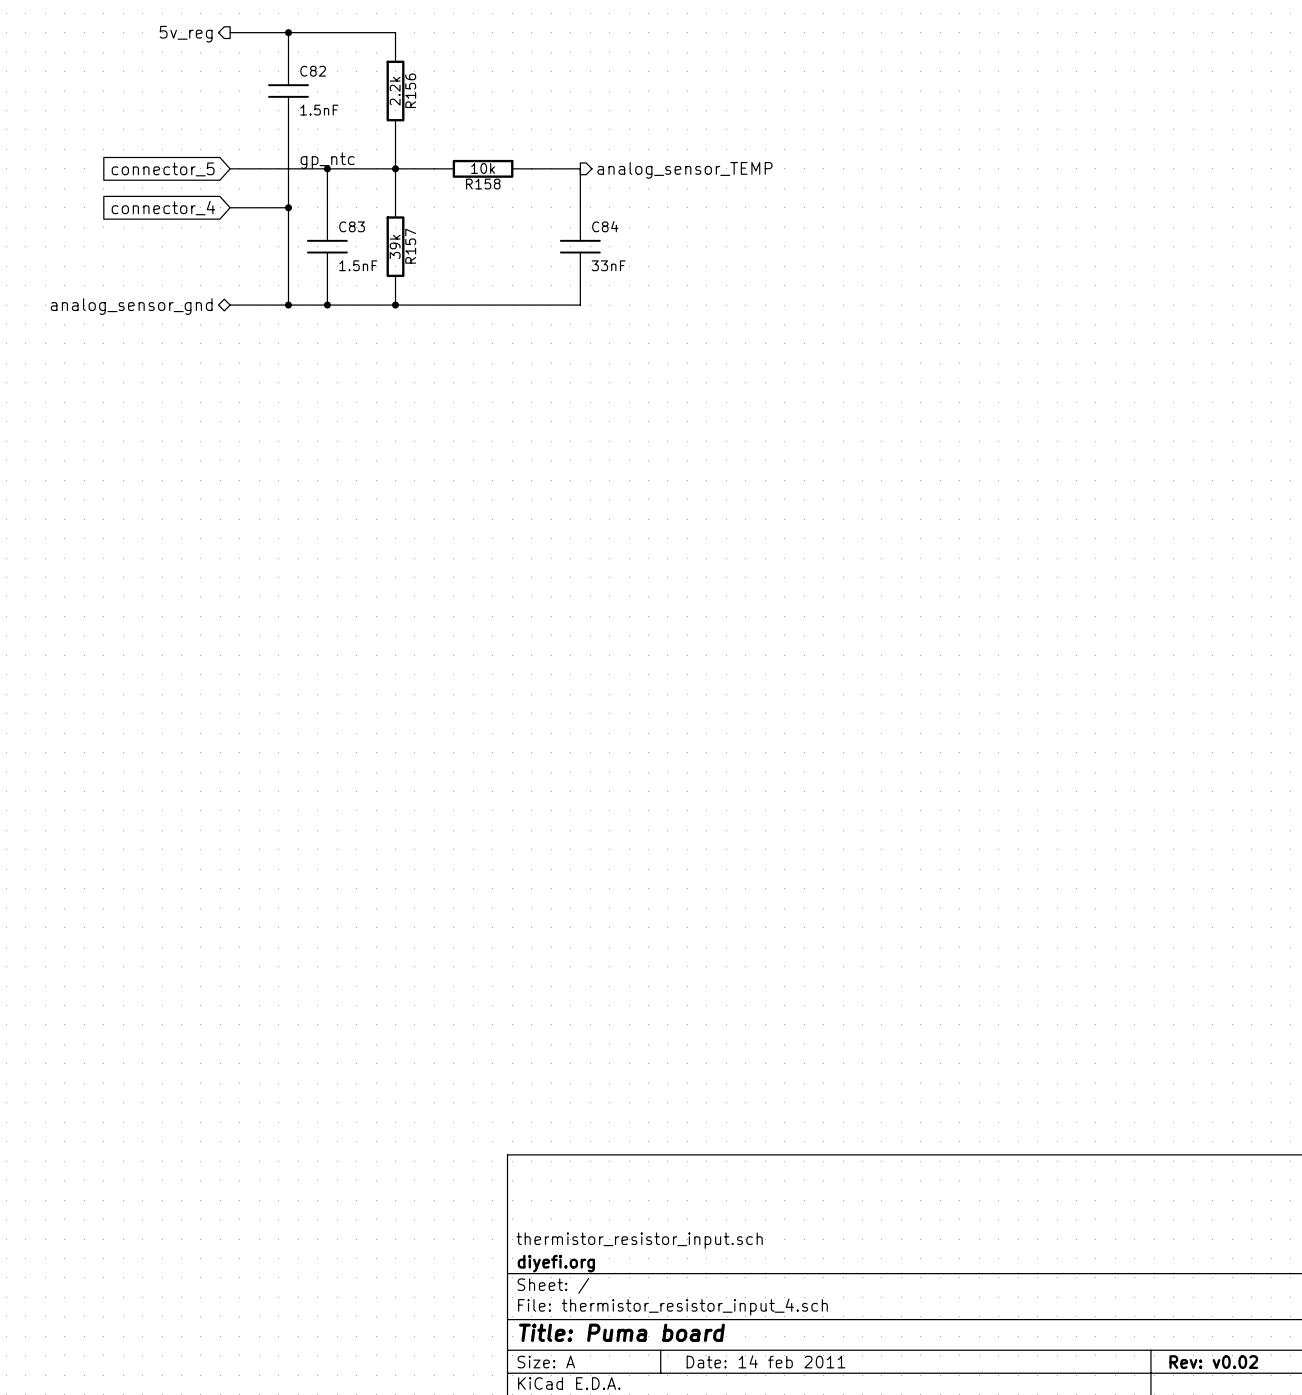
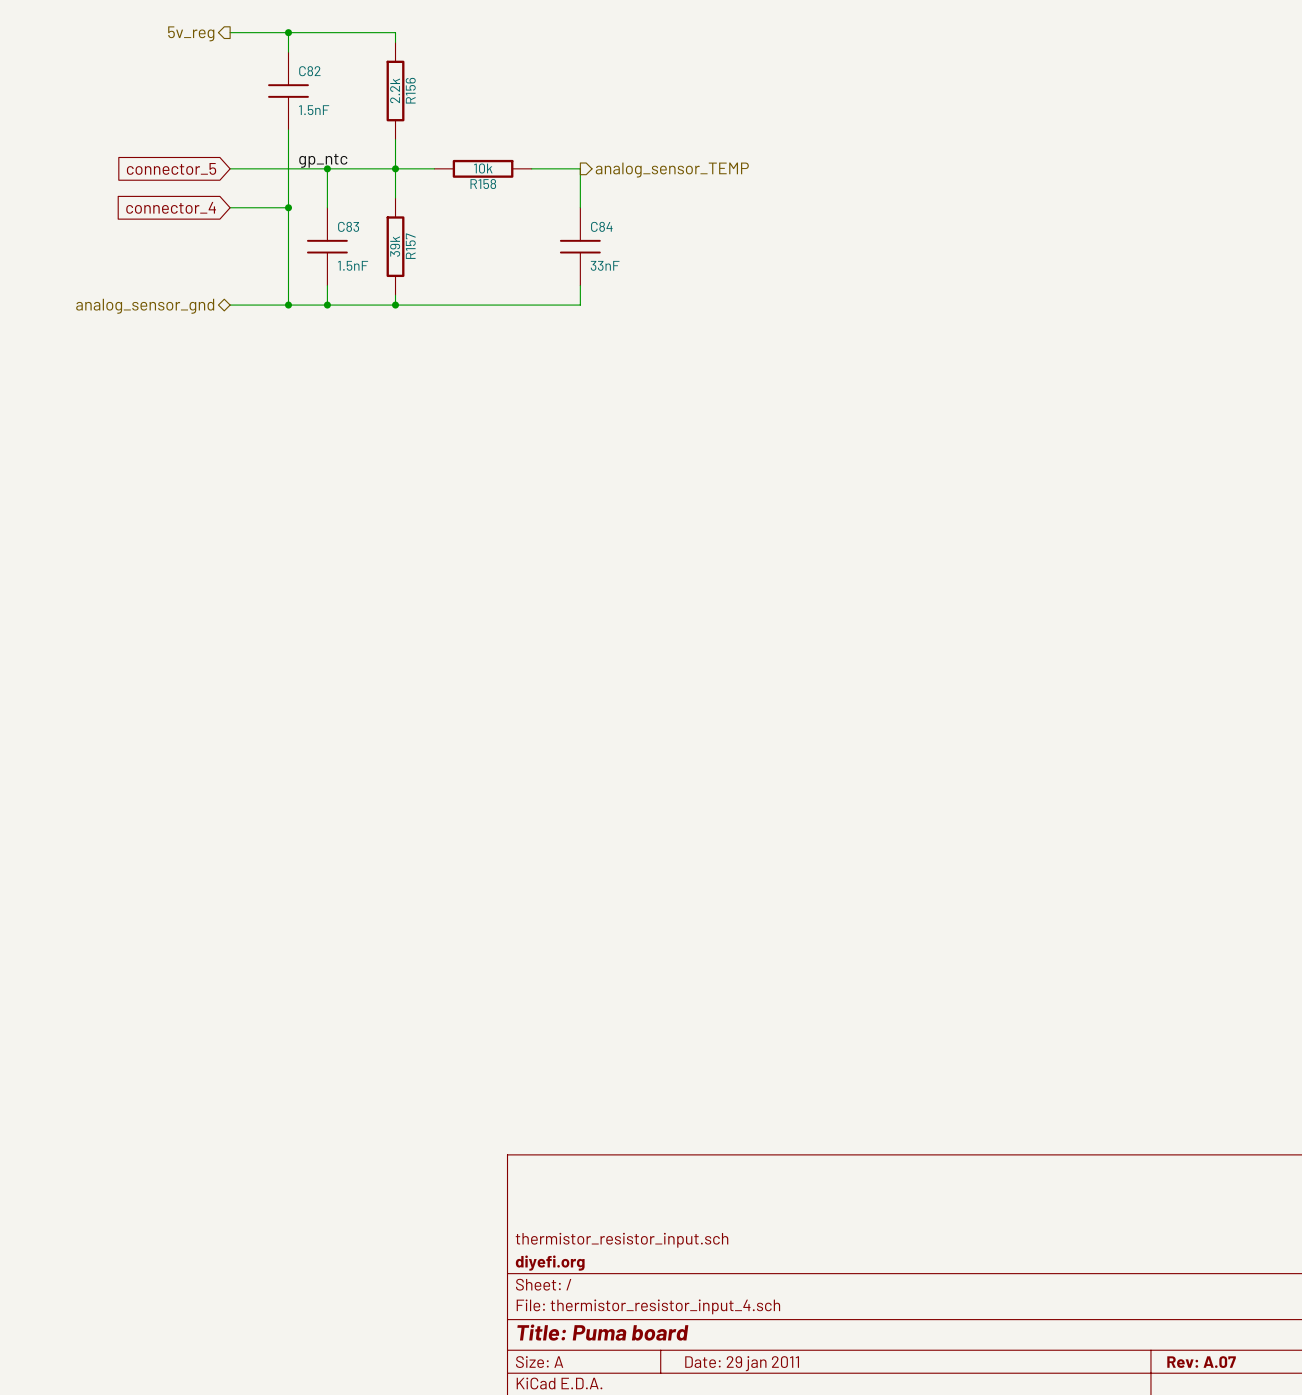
title block: Date: 14 feb 2011 (765, 1361) -> Date: 29 jan 2011 (742, 1363)
title block: Rev: v0.02 (1213, 1362) -> Rev: A.07 (1201, 1362)

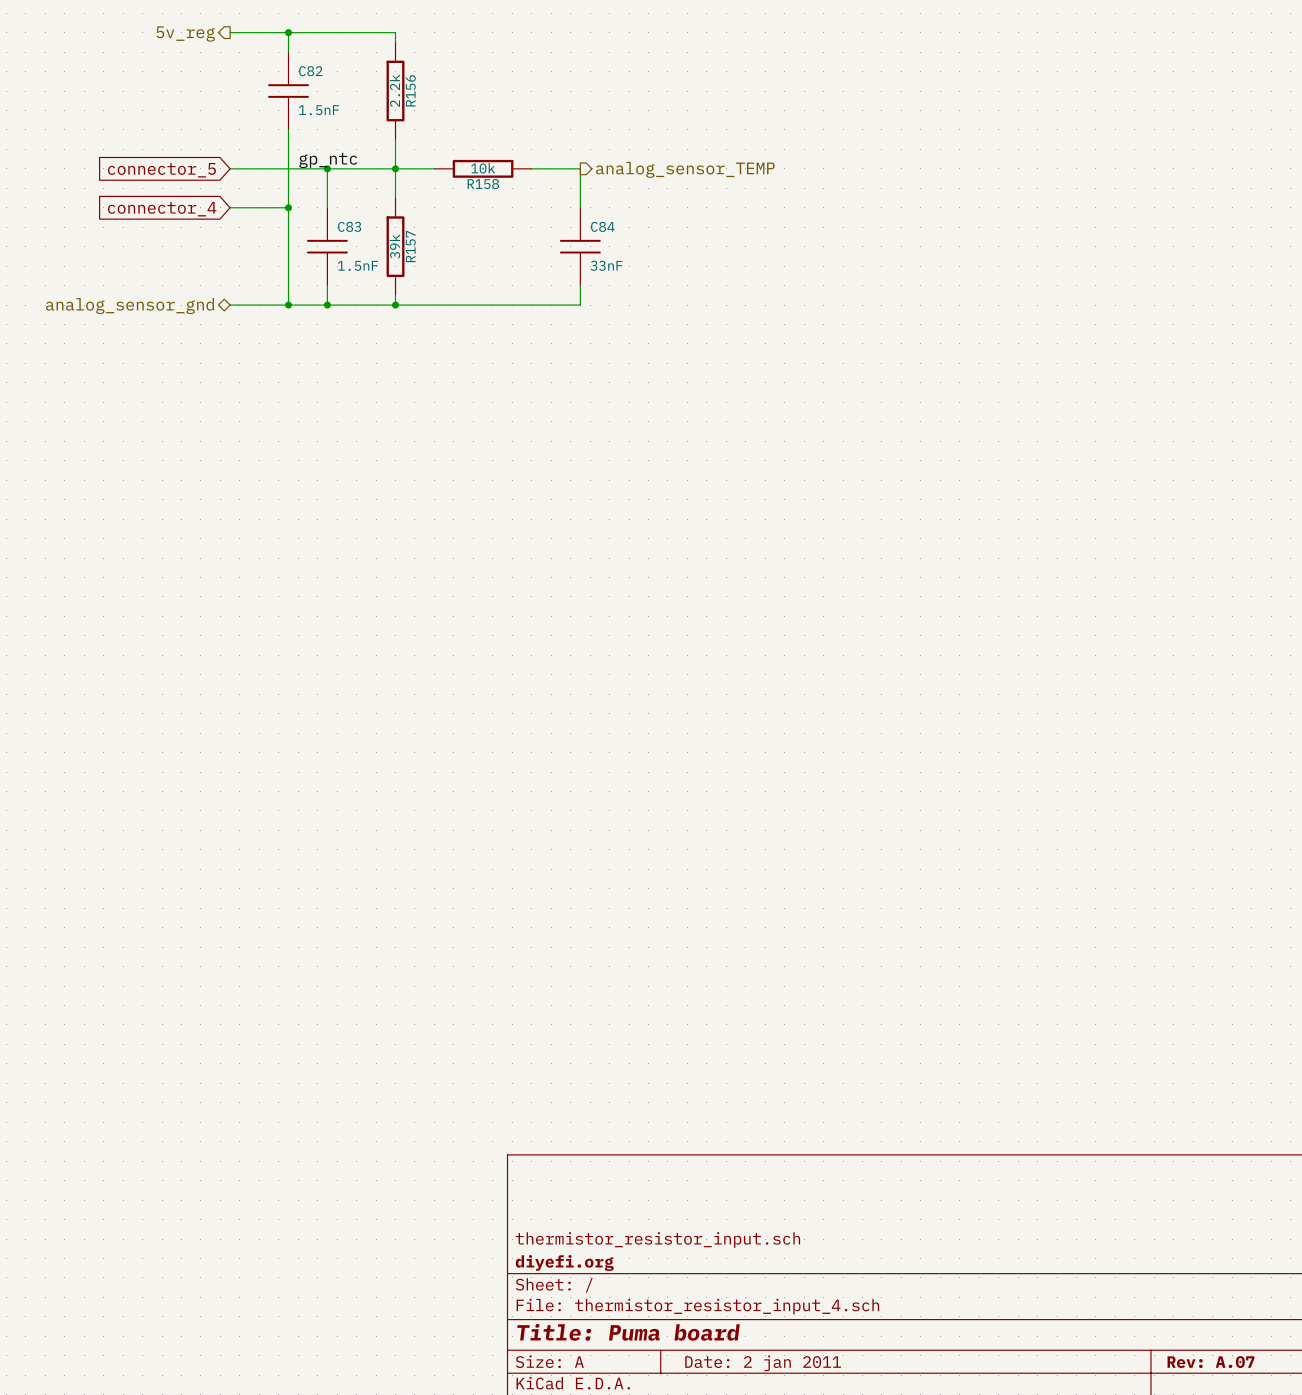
title block: Date: 29 jan 2011 (742, 1363) -> Date: 2 jan 2011 (763, 1363)

